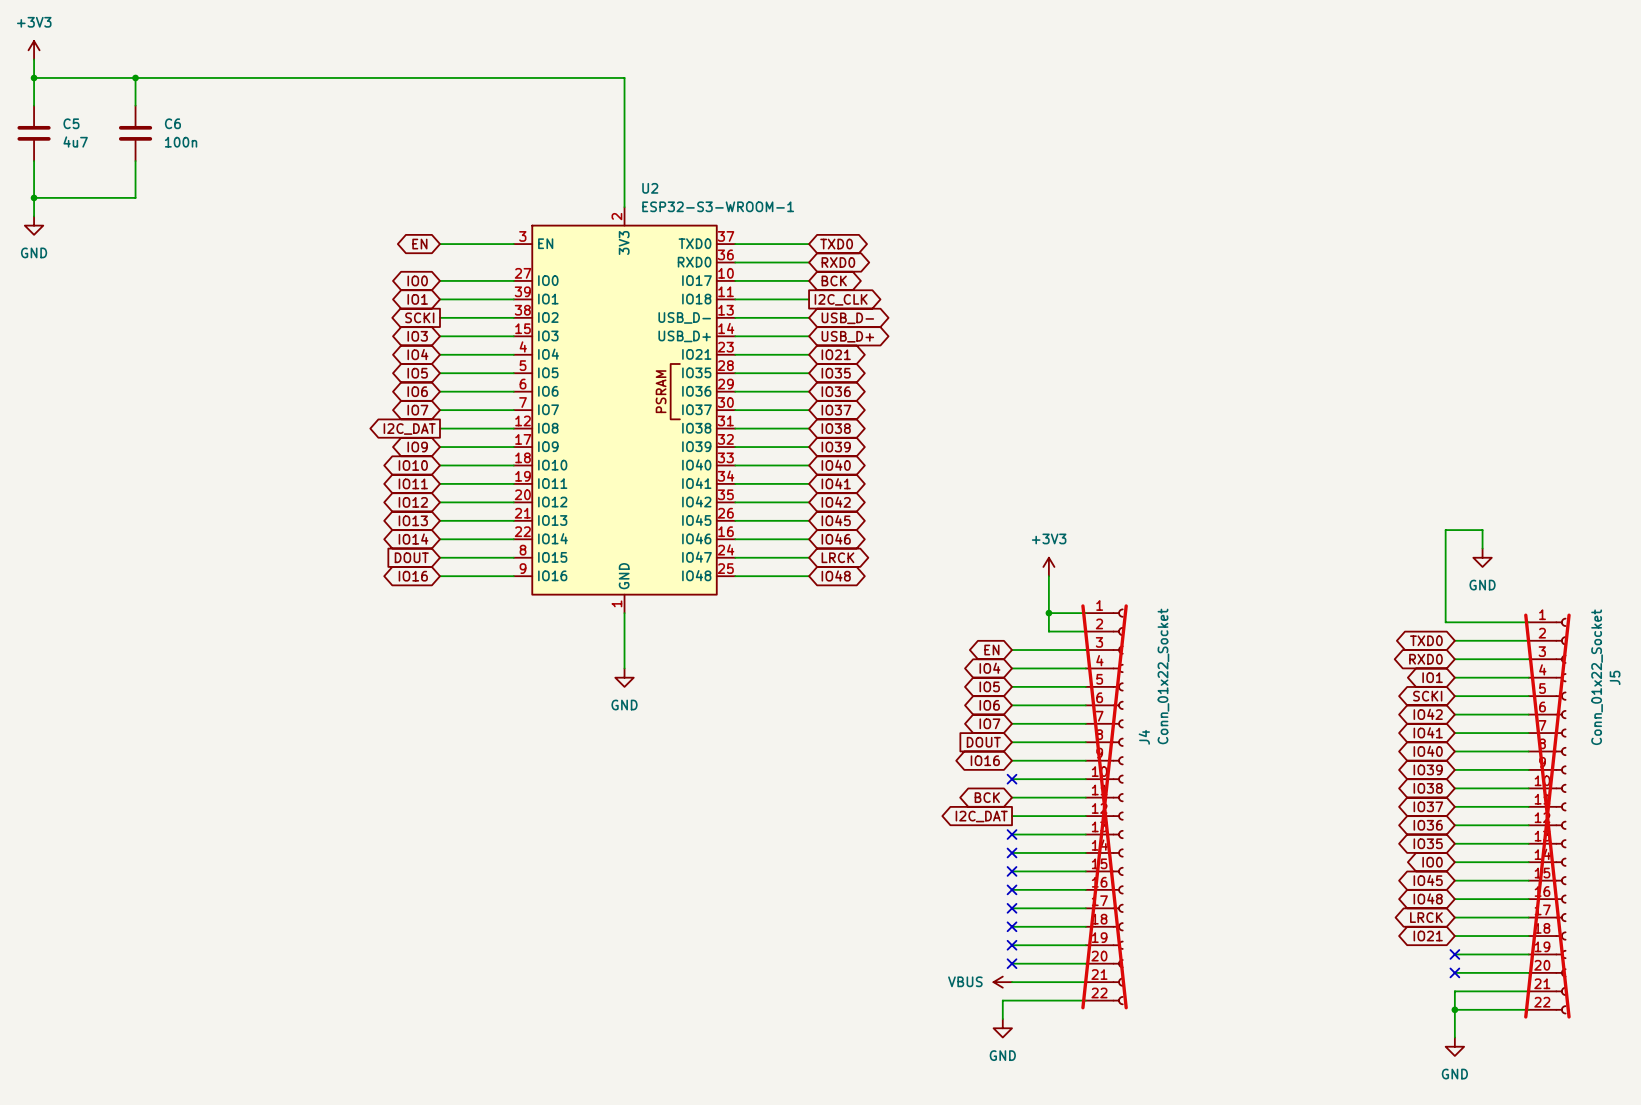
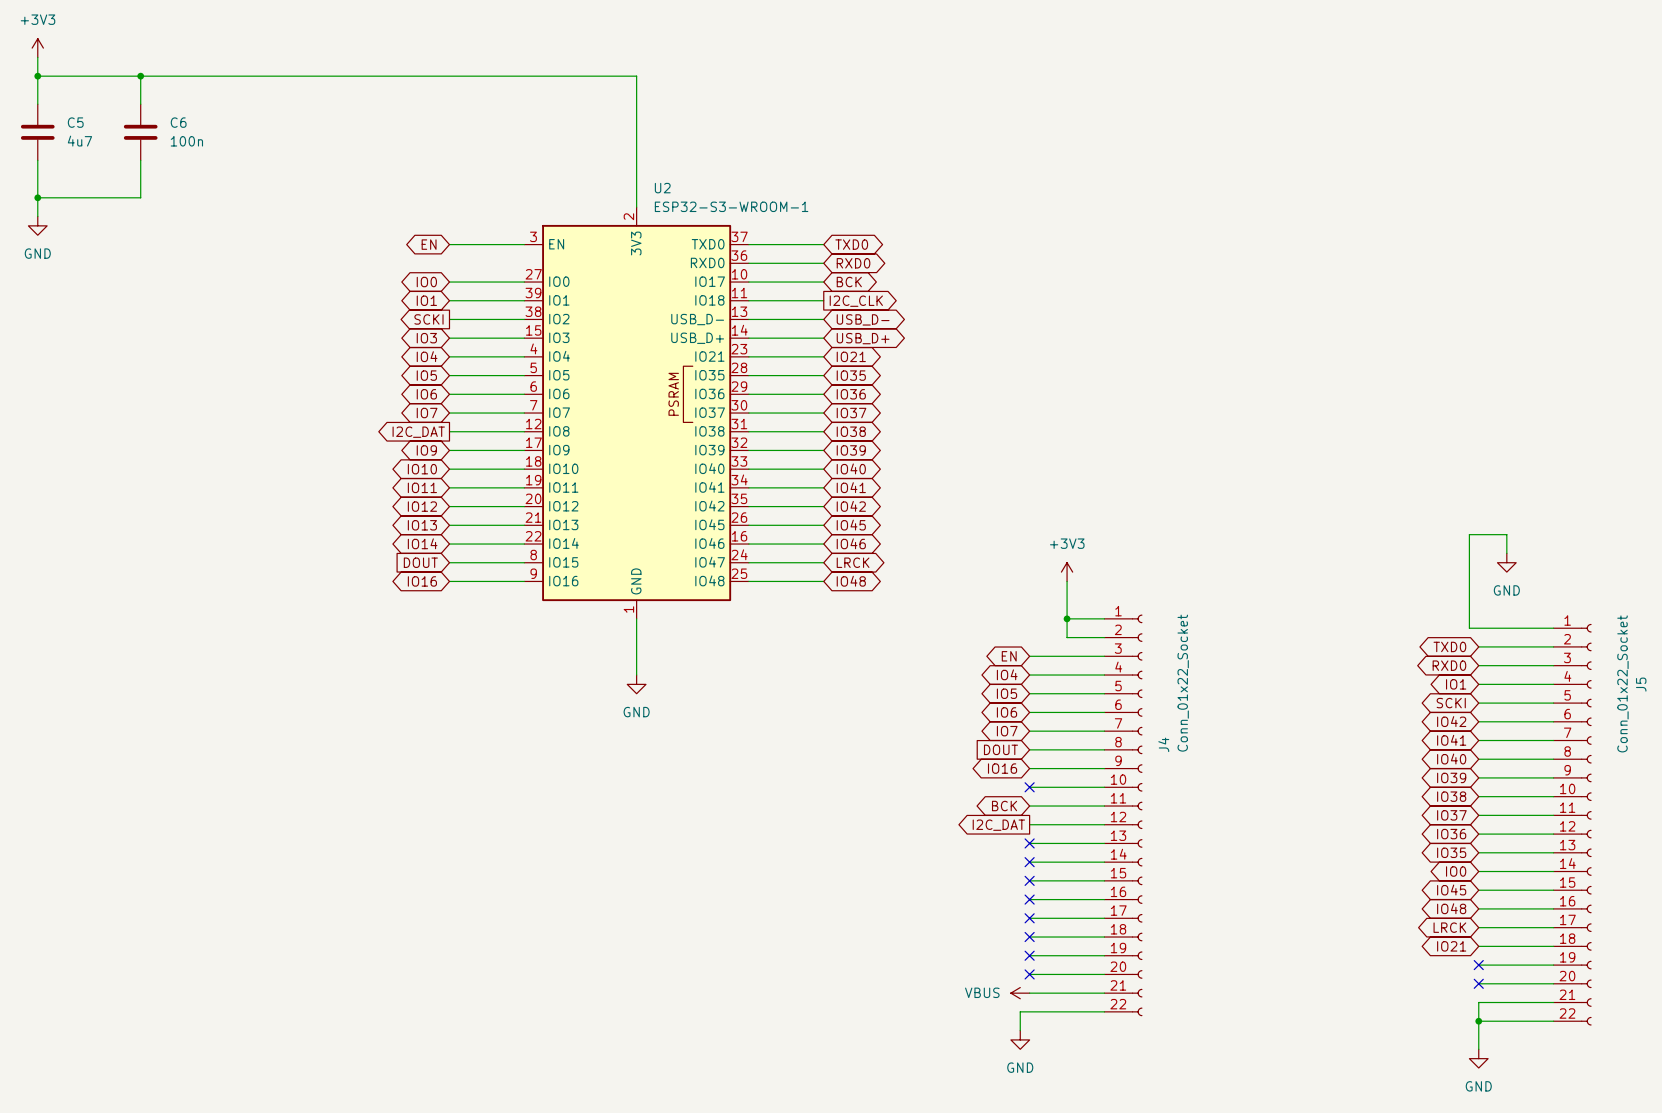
J4 do-not-place cross: (1104, 806) -> none
J5 do-not-place cross: (1547, 816) -> none

